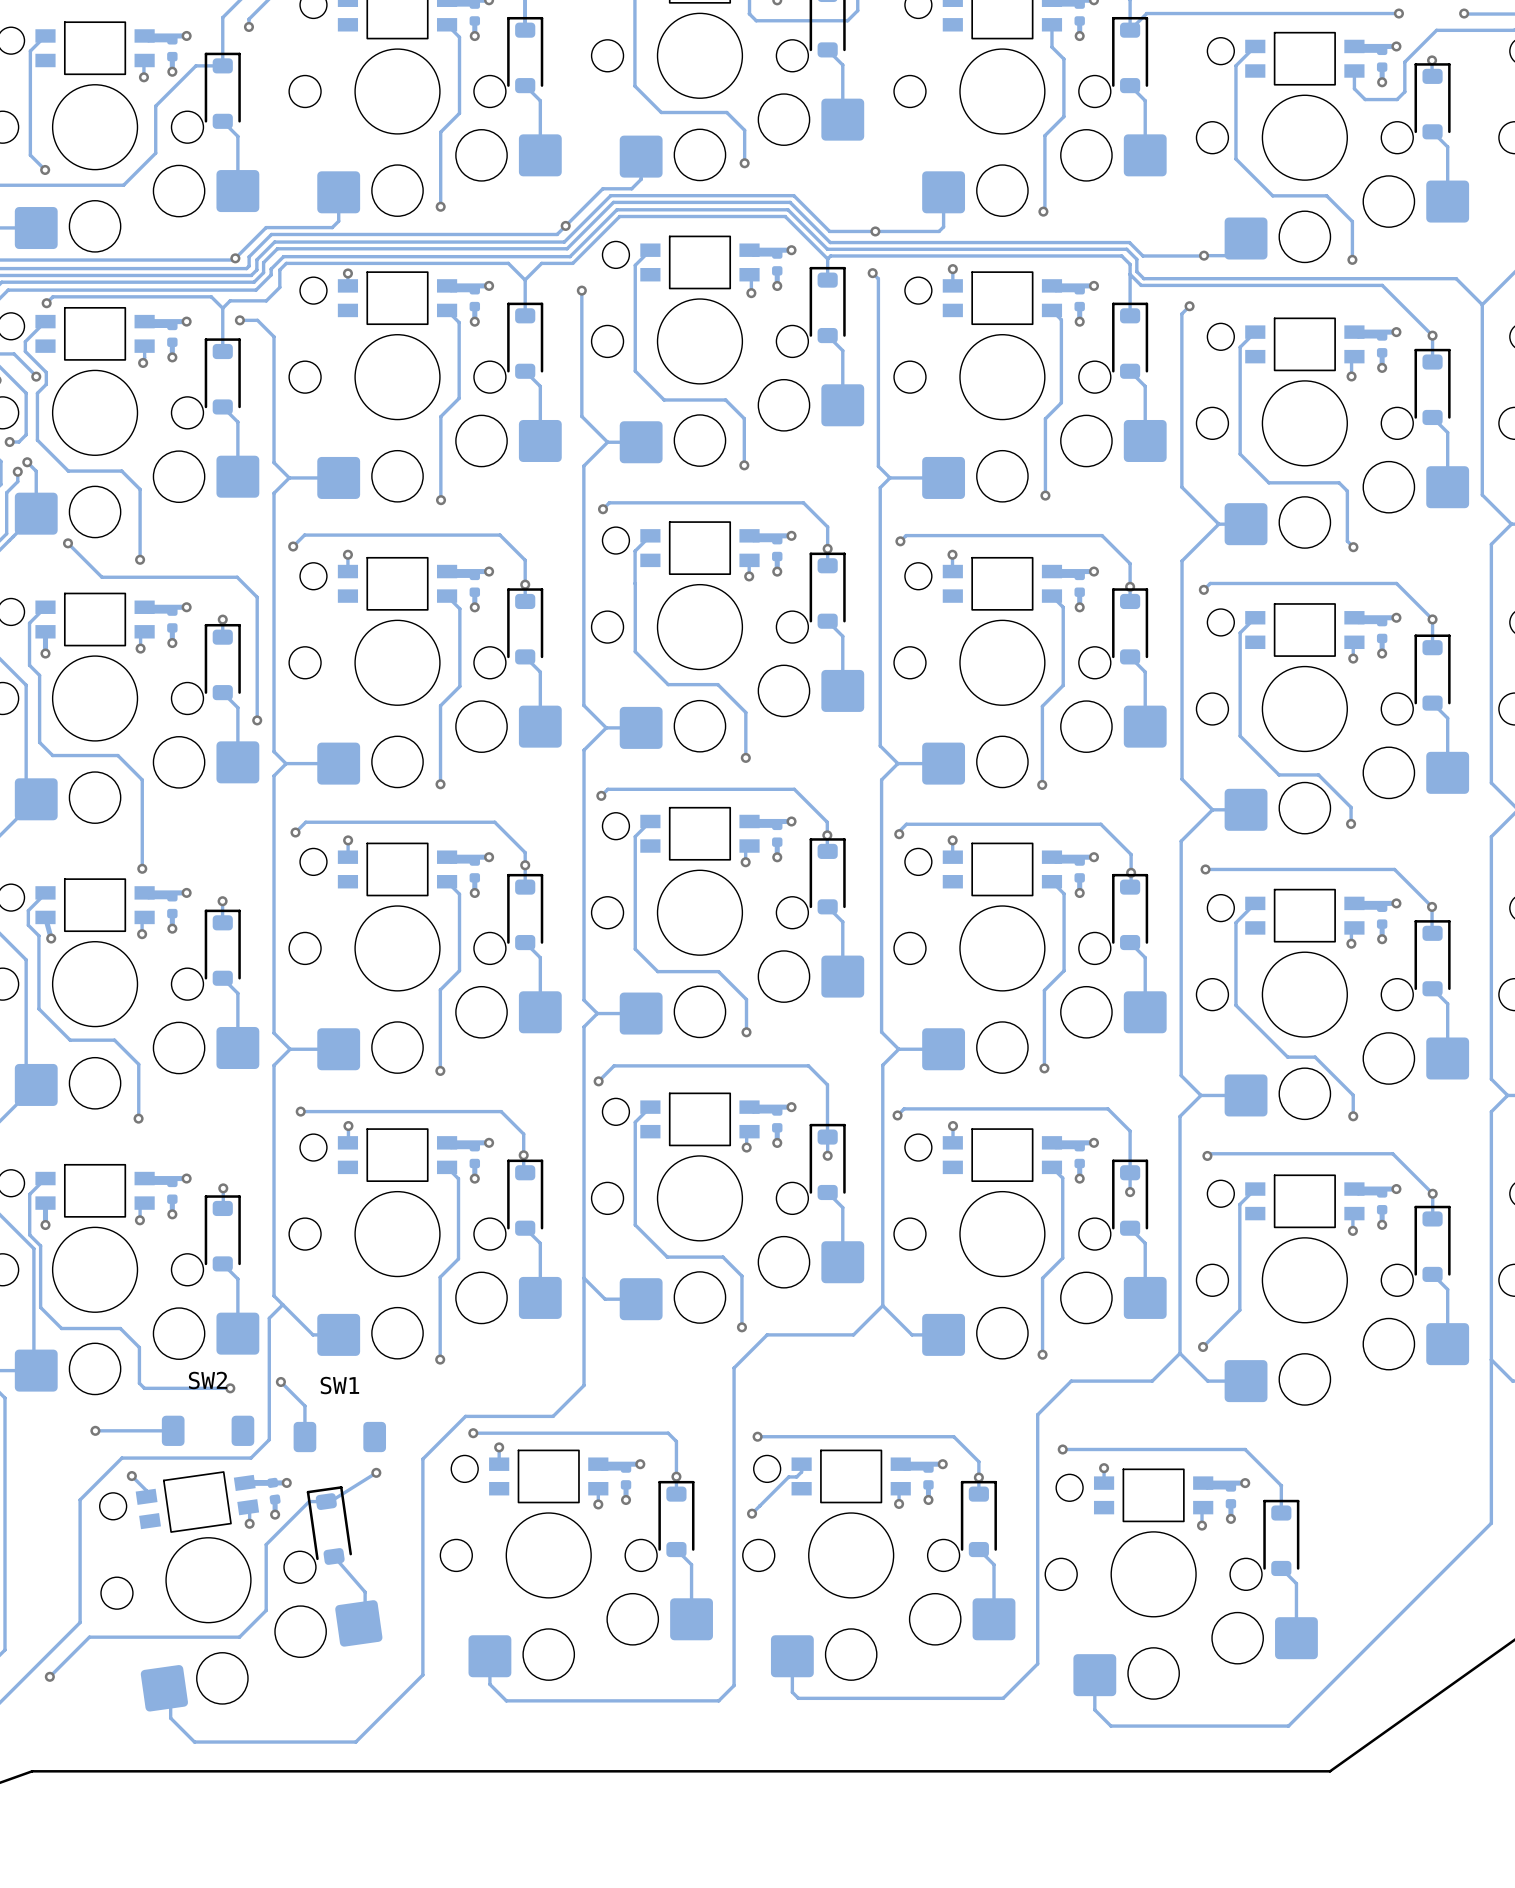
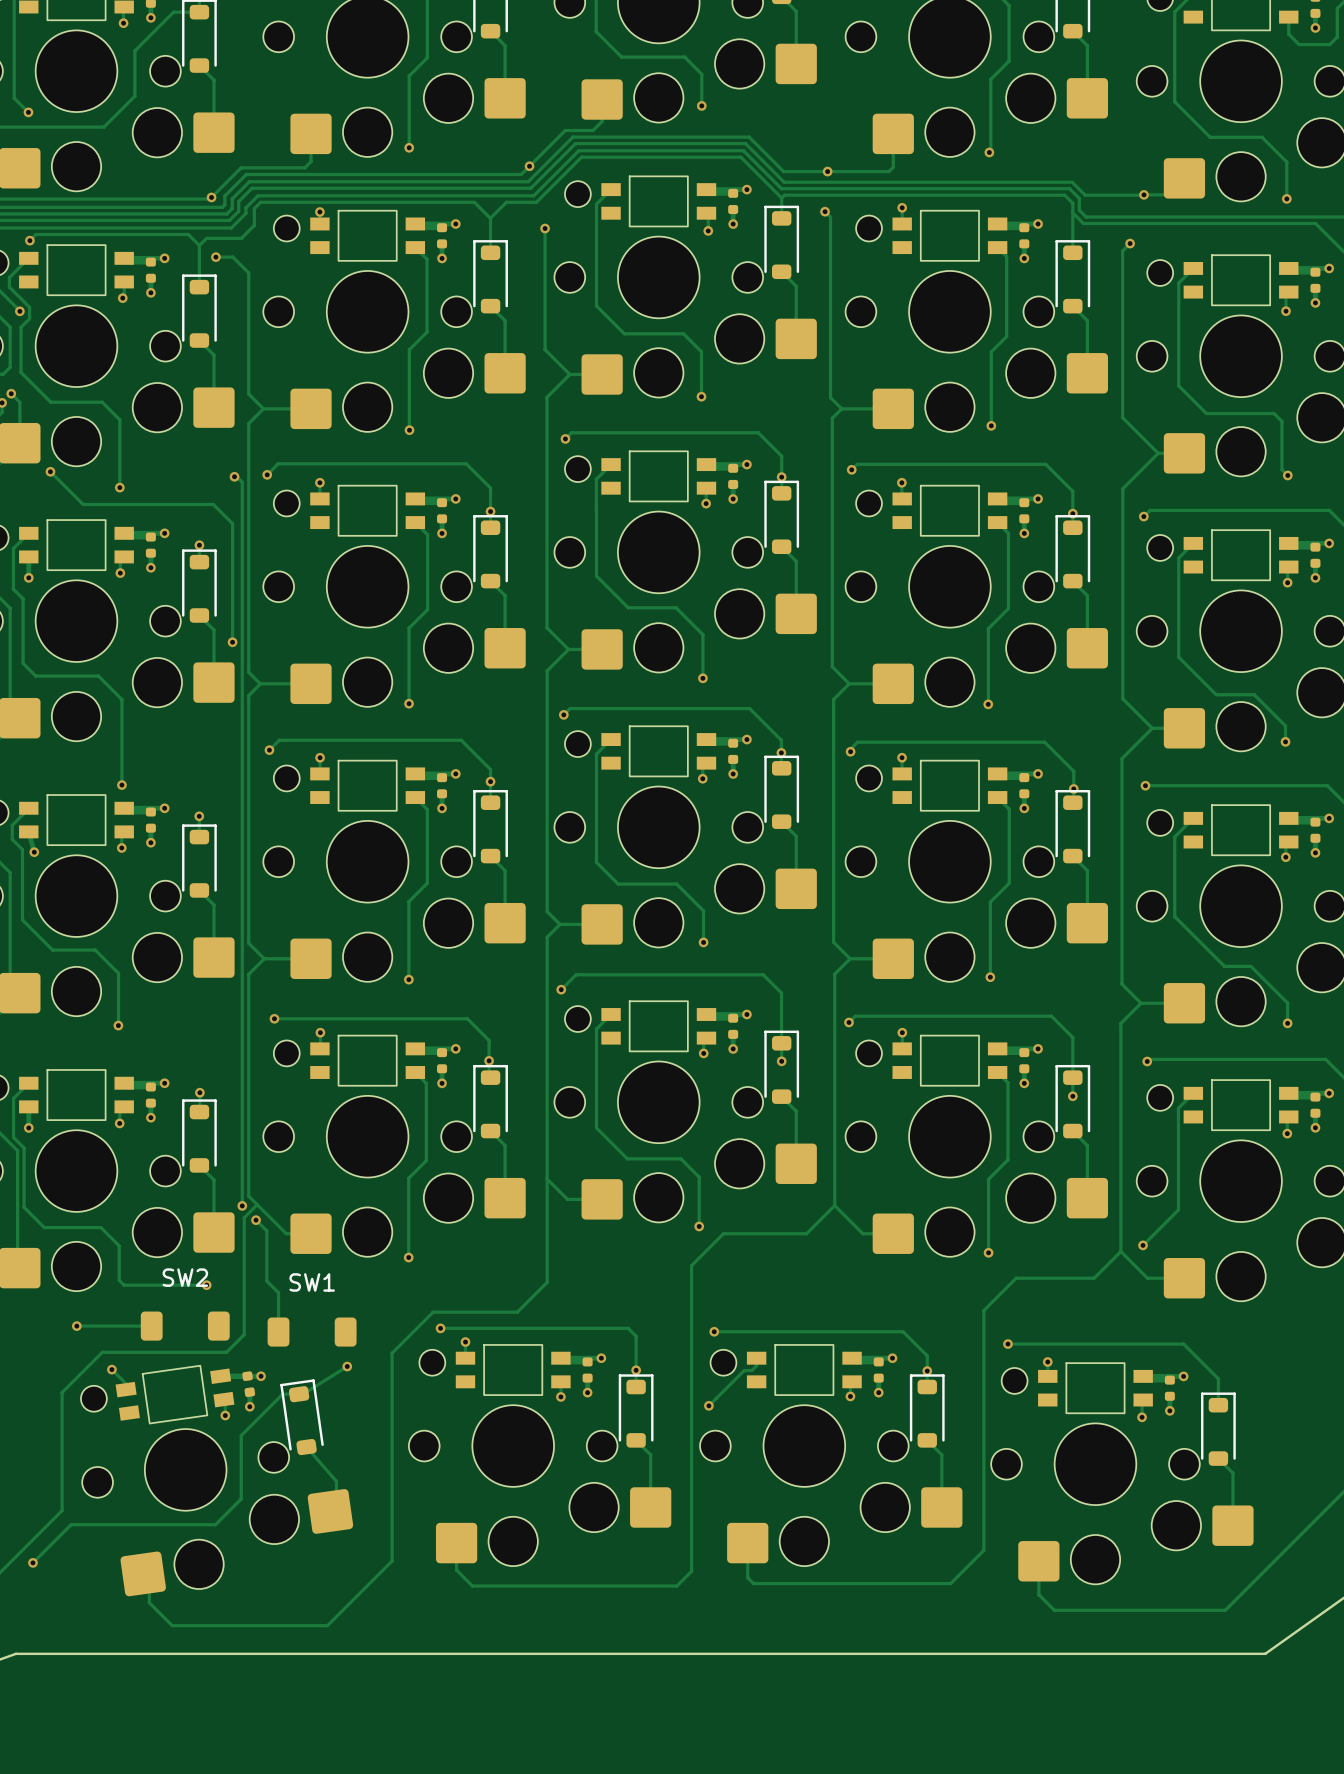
track: none -> (234, 476) (242, 482) (242, 1205)
via: none -> (234, 476)
via: none -> (242, 1205)
via: none -> (256, 1220)
track: (280, 1381) (304, 1406) -> (256, 1220) (266, 1230) (266, 1281) (278, 1292) (278, 1302)
via: (280, 1381) -> none

